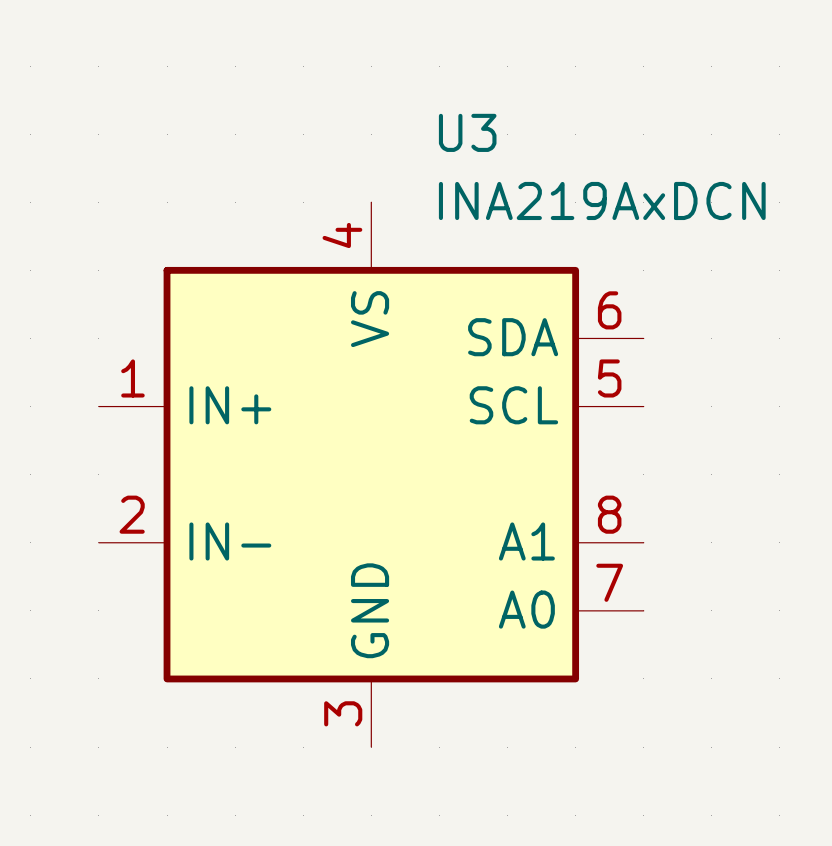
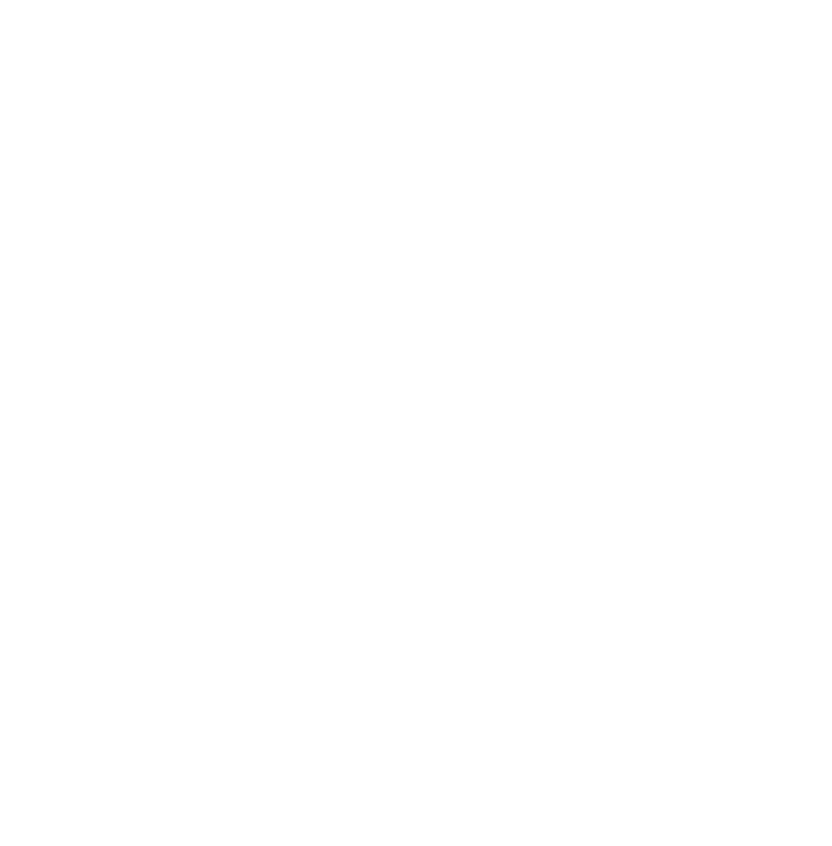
U3: INA219AxDCN (371, 474) -> none

